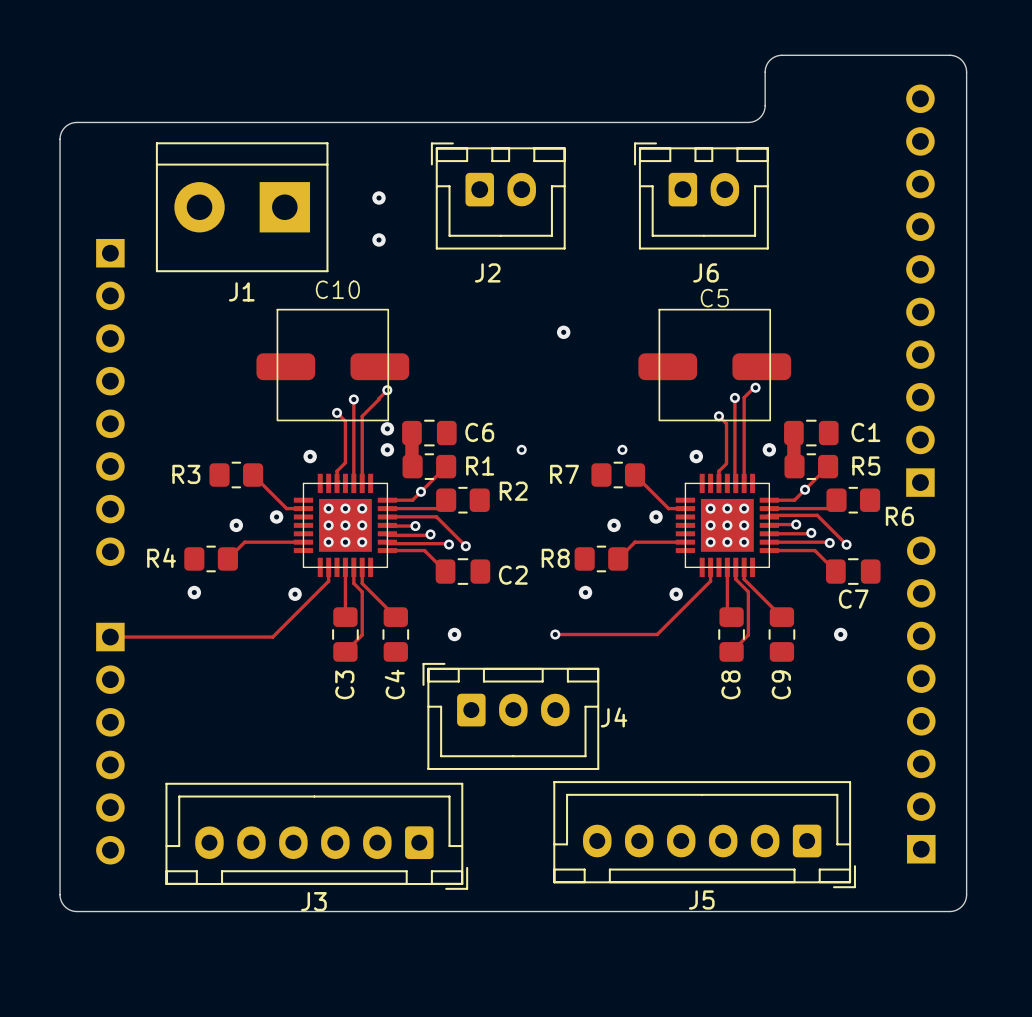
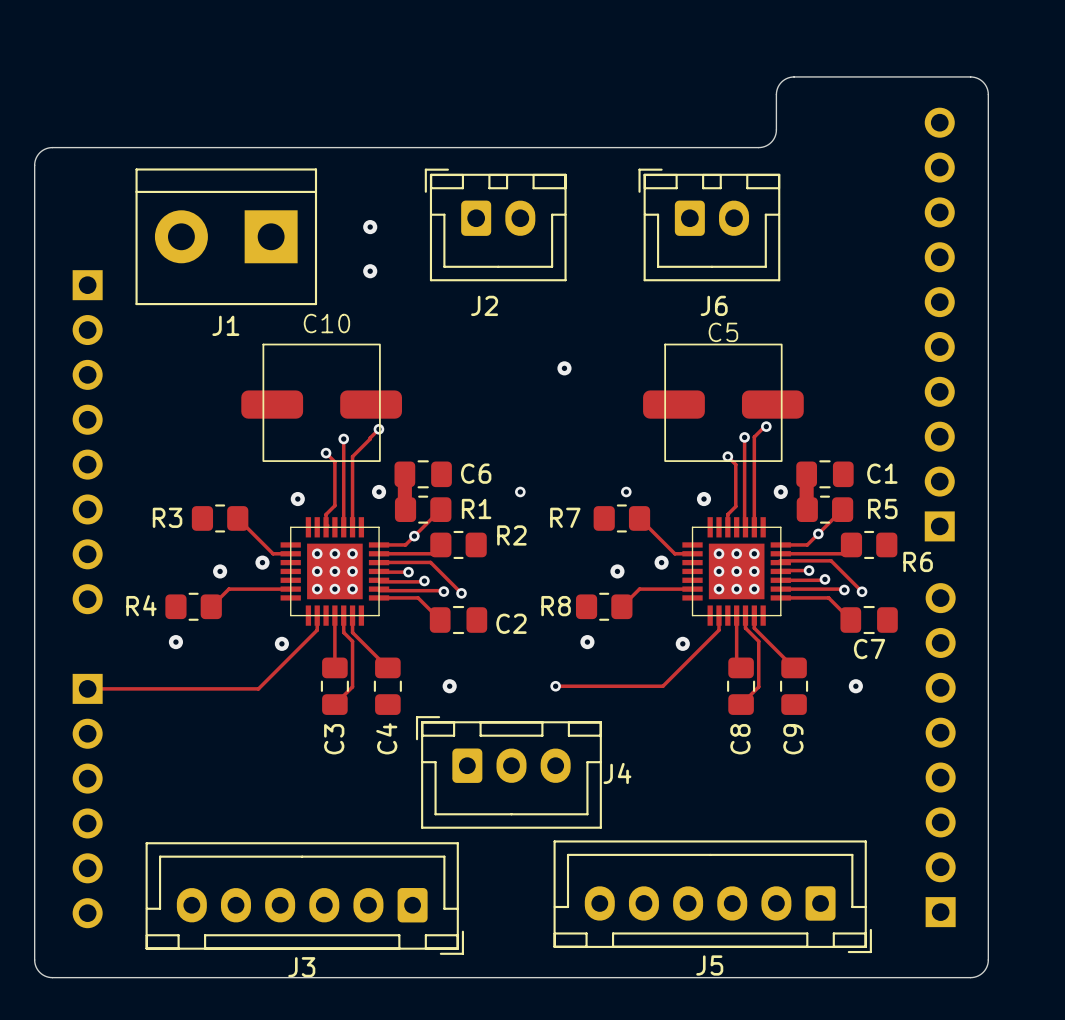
via: (387, 428) -> none

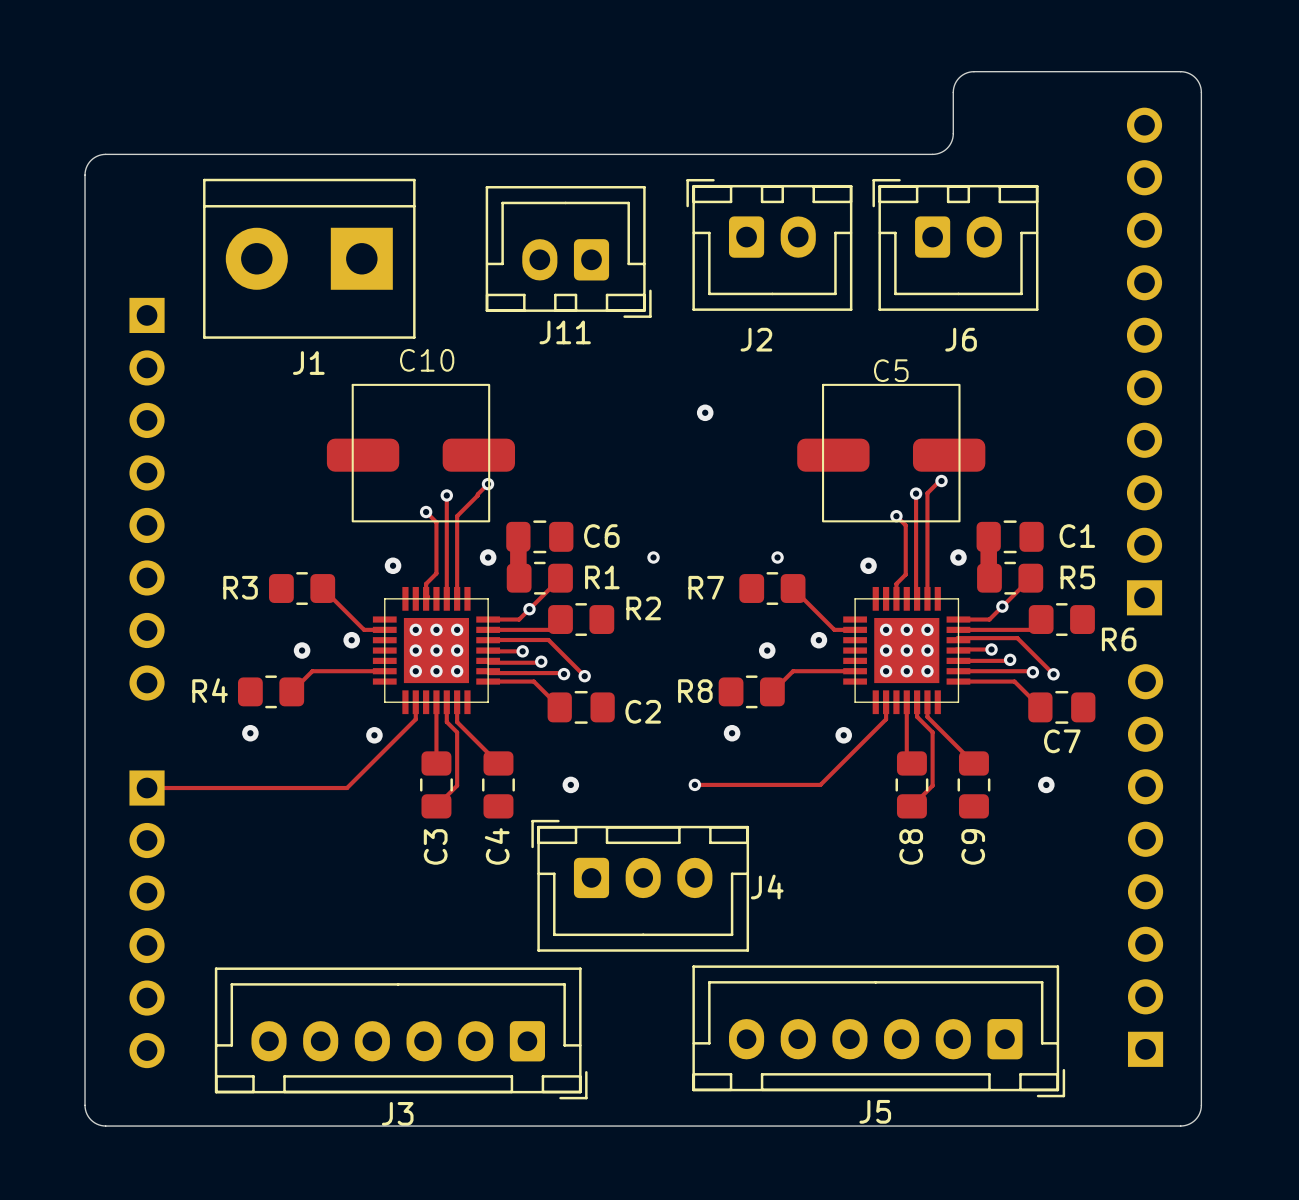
J2 position: (495, 224) -> (769, 244)
J6 position: (709, 224) -> (955, 244)
via: (370, 227) -> none
J11: none -> (568, 251)
via: (370, 271) -> none

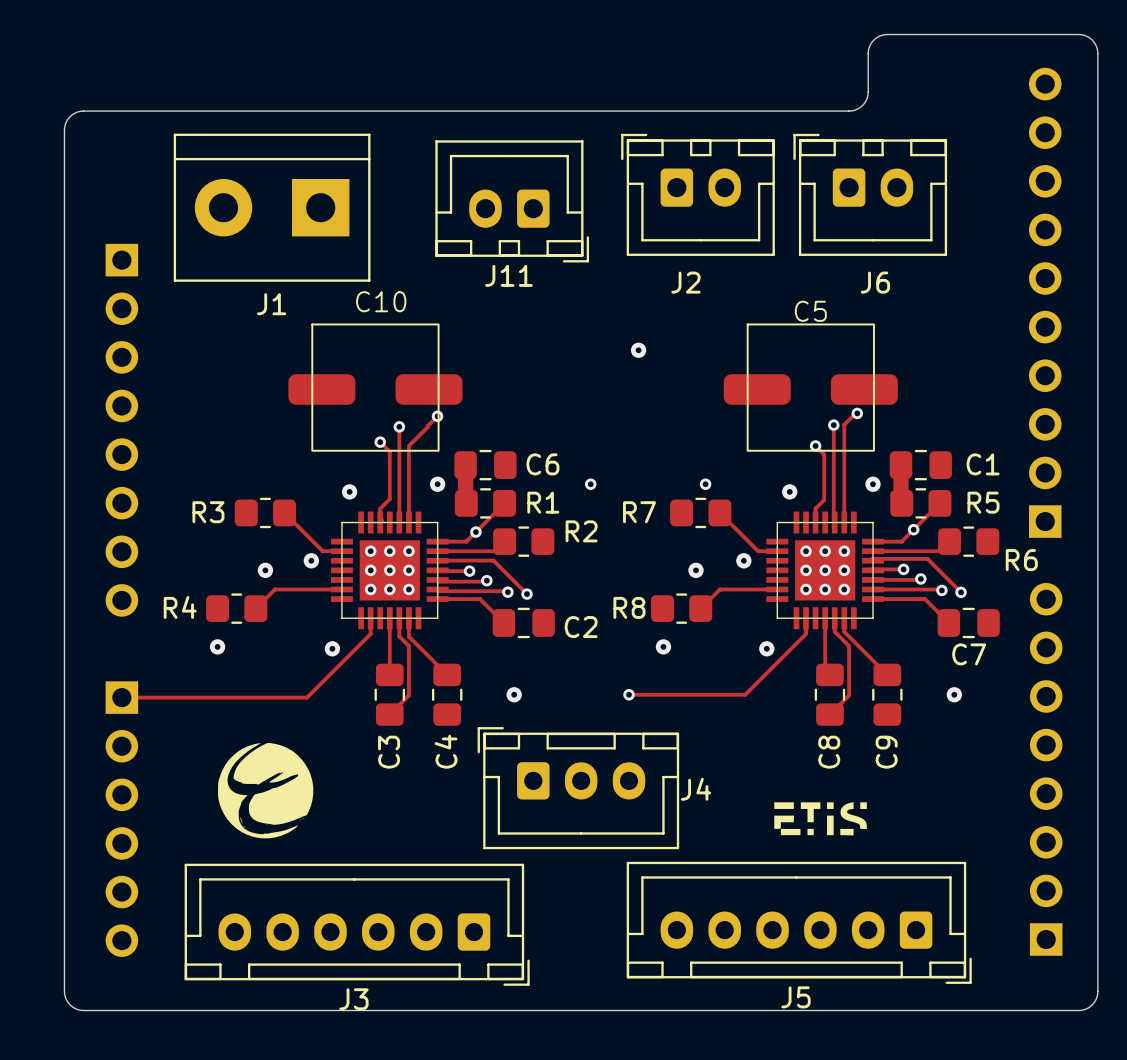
drawing: none -> [218, 742, 314, 839]
drawing: none -> [774, 802, 867, 836]

